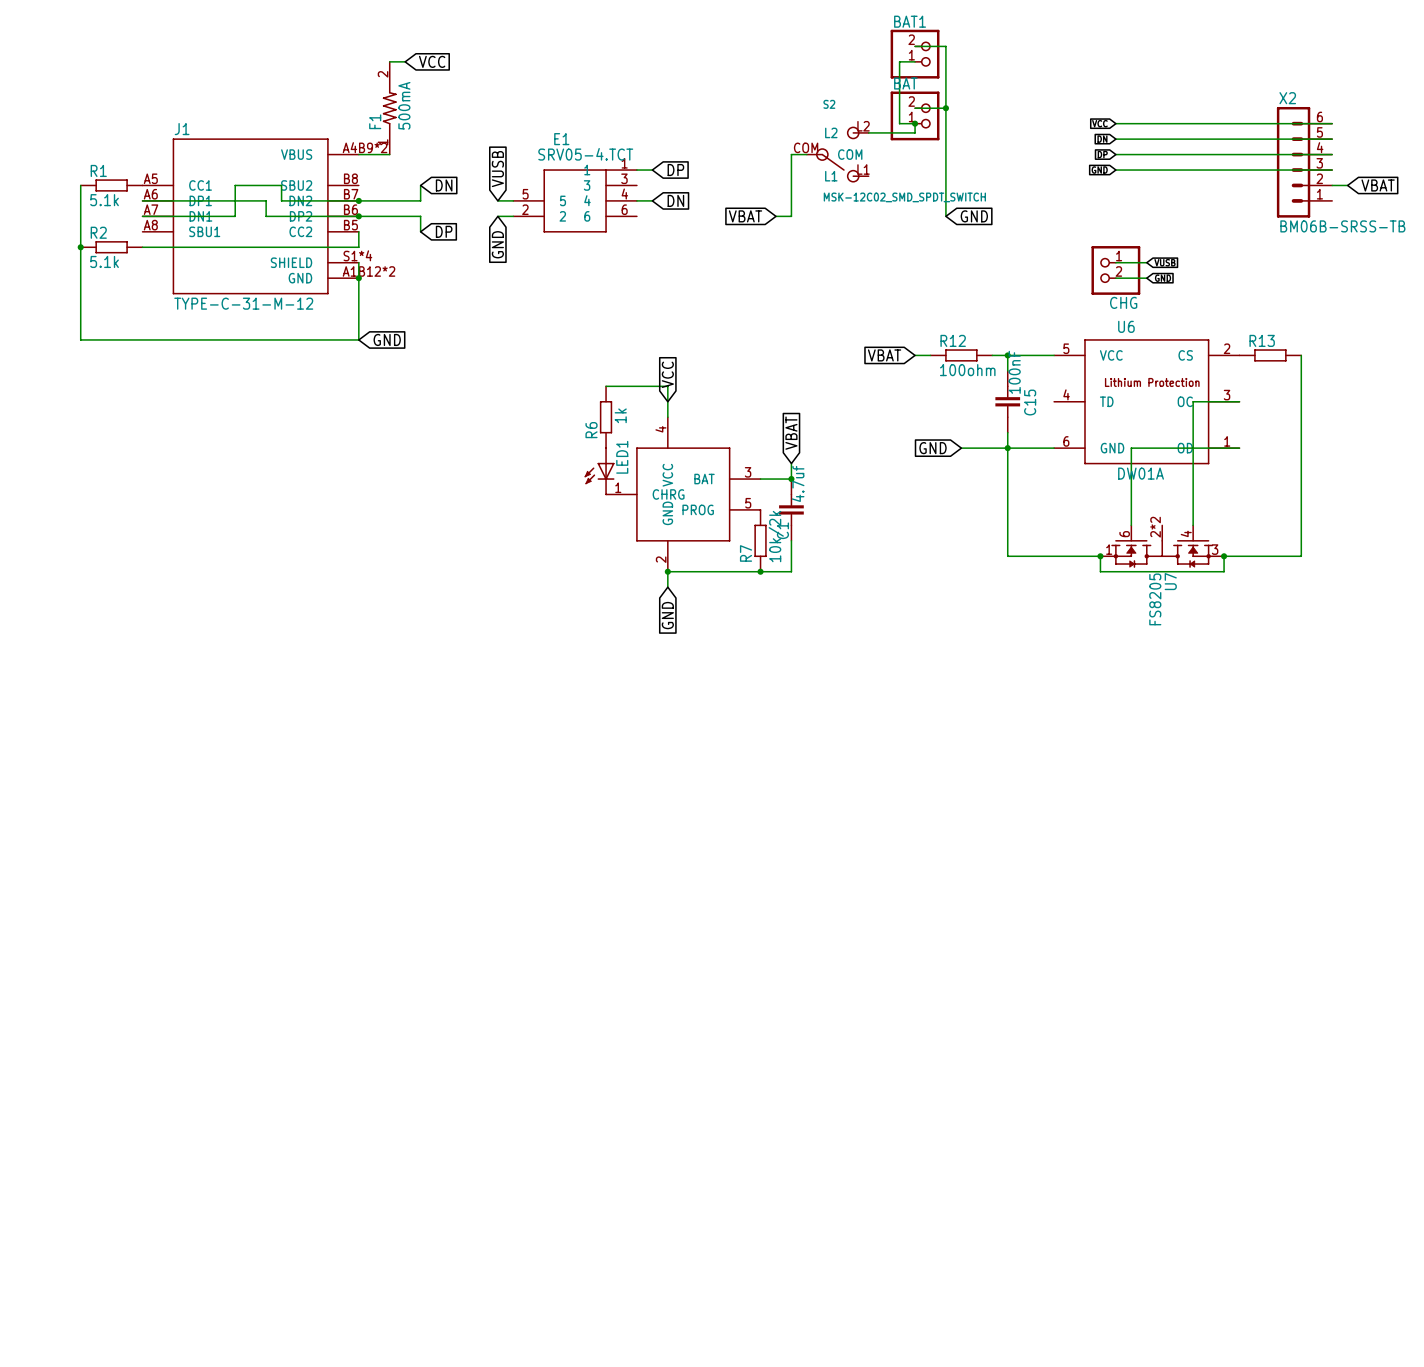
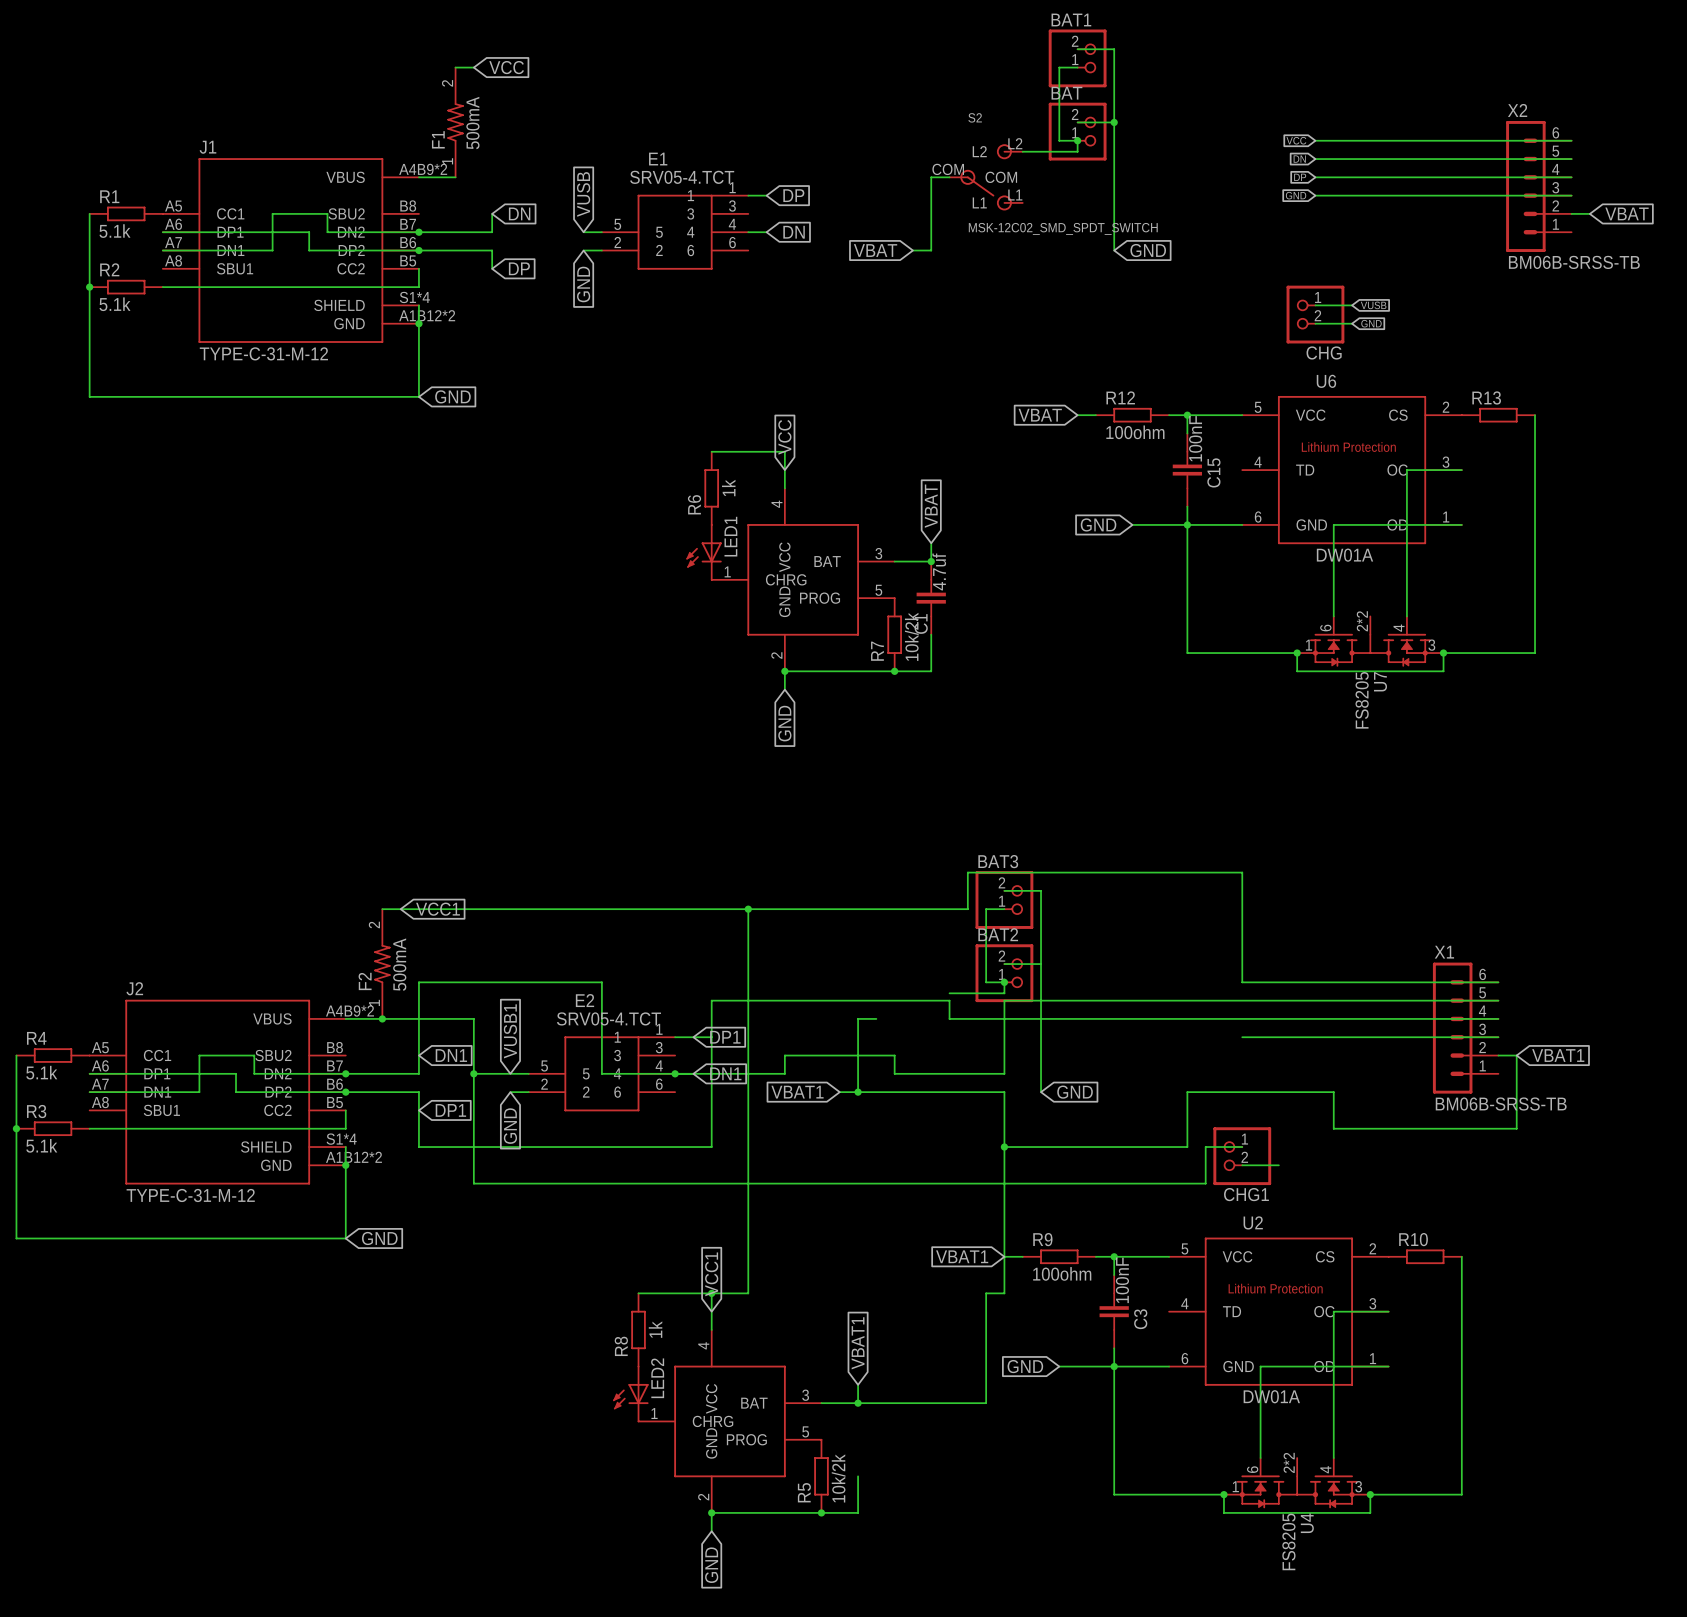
wire: none -> (1004, 890) (1041, 890) (1041, 1092)
BAT3: none -> (1004, 900)
wire: none -> (382, 909) (967, 909) (967, 872) (1242, 872) (1242, 982) (1498, 982)
global label: none -> VCC1 (438, 909)
wire: none -> (748, 909) (748, 1293) (638, 1293)
junction: none -> (748, 909)
wire: none -> (1004, 909) (986, 909) (986, 982) (1004, 982) (1004, 993) (949, 993)
F2: none -> 500mA (382, 964)
wire: none -> (1004, 964) (1041, 964)
BAT2: none -> (1004, 973)
junction: none -> (1004, 982)
wire: none -> (1498, 1000) (1004, 1000) (1004, 1073) (894, 1073) (894, 1055) (784, 1055) (784, 1073) (601, 1073) (601, 982) (418, 982) (418, 1073) (254, 1073) (254, 1055) (199, 1055) (199, 1092) (89, 1092)
wire: none -> (345, 1018) (473, 1018) (473, 1183) (1205, 1183) (1205, 1147) (1242, 1147)
junction: none -> (382, 1018)
wire: none -> (876, 1018) (858, 1018) (858, 1092)
wire: none -> (1498, 1018) (949, 1018) (949, 1000) (711, 1000) (711, 1147) (418, 1147) (418, 1092) (236, 1092) (236, 1073) (89, 1073)
X1: none -> BM06B-SRSS-TB (1465, 1028)
global label: none -> VUSB1 (510, 1031)
wire: none -> (675, 1037) (711, 1037)
global label: none -> DP1 (725, 1037)
wire: none -> (1242, 1037) (1498, 1037)
wire: none -> (16, 1055) (16, 1238) (345, 1238) (345, 1147)
R4: none -> 5.1k (53, 1055)
global label: none -> DN1 (451, 1055)
wire: none -> (1498, 1055) (1516, 1055) (1516, 1128) (1333, 1128) (1333, 1092) (1187, 1092) (1187, 1147) (1004, 1147)
global label: none -> VBAT1 (1558, 1055)
junction: none -> (345, 1073)
wire: none -> (473, 1073) (528, 1073)
junction: none -> (473, 1073)
E2: none -> SRV05-4.TCT (601, 1073)
junction: none -> (675, 1073)
global label: none -> DN1 (725, 1073)
J2: none -> TYPE-C-31-M-12 (217, 1092)
junction: none -> (345, 1092)
wire: none -> (510, 1092) (528, 1092)
global label: none -> VBAT1 (797, 1092)
wire: none -> (839, 1092) (1004, 1092) (1004, 1293) (986, 1293) (986, 1403) (821, 1403)
junction: none -> (858, 1092)
global label: none -> GND (1075, 1092)
wire: none -> (345, 1110) (345, 1128) (89, 1128)
global label: none -> DP1 (450, 1110)
global label: none -> GND (510, 1126)
junction: none -> (16, 1128)
R3: none -> 5.1k (53, 1128)
junction: none -> (1004, 1147)
CHG1: none -> (1242, 1156)
junction: none -> (345, 1165)
wire: none -> (1242, 1165) (1278, 1165)
global label: none -> GND (379, 1238)
global label: none -> VBAT1 (962, 1256)
wire: none -> (1004, 1256) (1022, 1256)
R9: none -> 100ohm (1059, 1256)
wire: none -> (1095, 1256) (1169, 1256)
wire: none -> (1114, 1256) (1114, 1275)
junction: none -> (1114, 1256)
R10: none -> (1425, 1256)
wire: none -> (1461, 1256) (1461, 1494) (1370, 1494) (1370, 1512) (1223, 1512) (1223, 1494) (1114, 1494) (1114, 1348)
global label: none -> VCC1 (711, 1274)
wire: none -> (711, 1293) (711, 1329)
junction: none -> (711, 1293)
C3: none -> 100nF (1114, 1311)
U2: none -> DW01A (1278, 1311)
wire: none -> (1388, 1311) (1333, 1311) (1333, 1458)
R8: none -> 1k (638, 1329)
global label: none -> VBAT1 (858, 1343)
global label: none -> GND (1025, 1366)
wire: none -> (1059, 1366) (1169, 1366)
junction: none -> (1114, 1366)
wire: none -> (1388, 1366) (1260, 1366) (1260, 1458)
wire: none -> (858, 1384) (858, 1403)
LED2: none -> (630, 1394)
junction: none -> (858, 1403)
part: none -> (729, 1421)
R5: none -> 10k/2k (821, 1476)
wire: none -> (858, 1476) (858, 1512) (711, 1512) (711, 1531)
U4: none -> FS8205 (1297, 1483)
junction: none -> (1223, 1494)
junction: none -> (1370, 1494)
junction: none -> (711, 1512)
junction: none -> (821, 1512)
global label: none -> GND (711, 1565)

